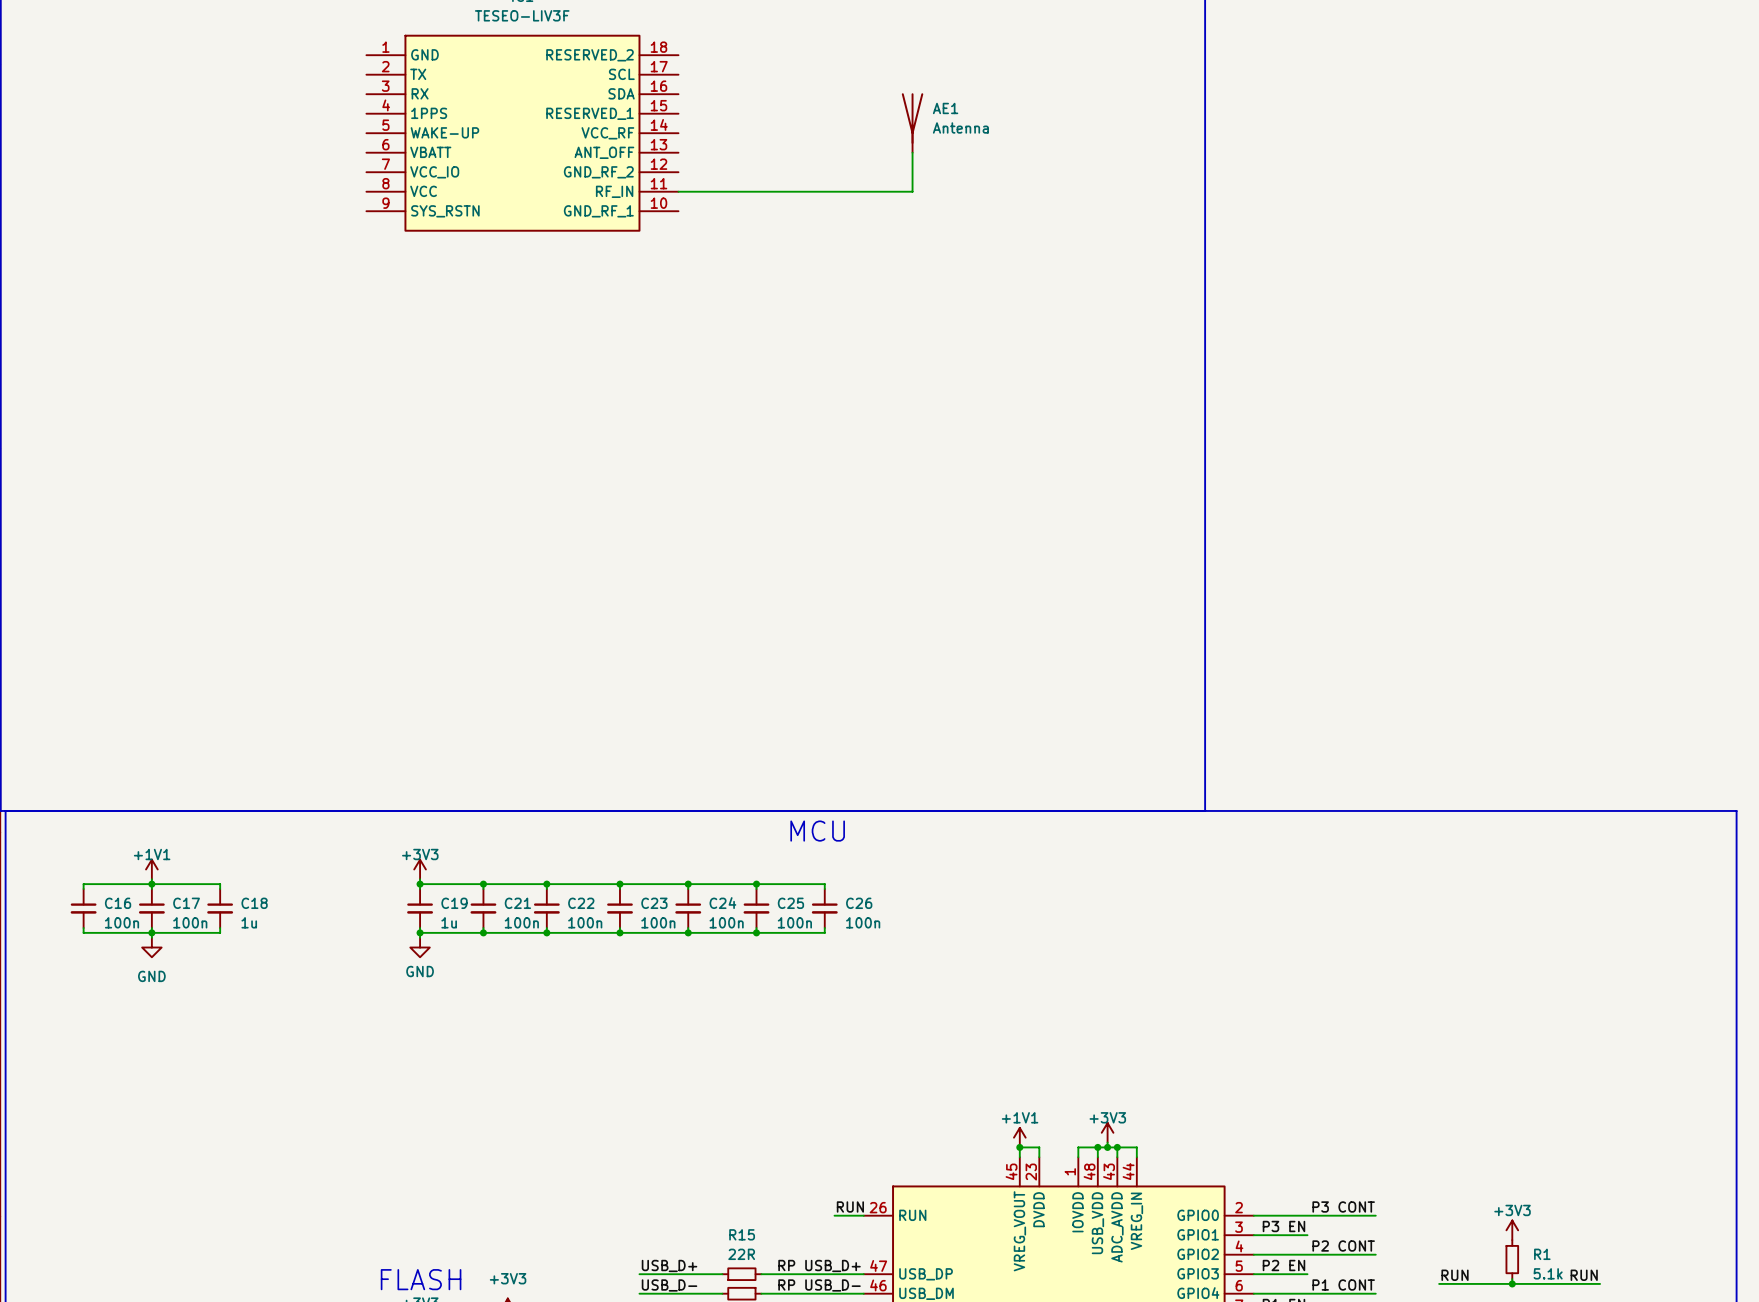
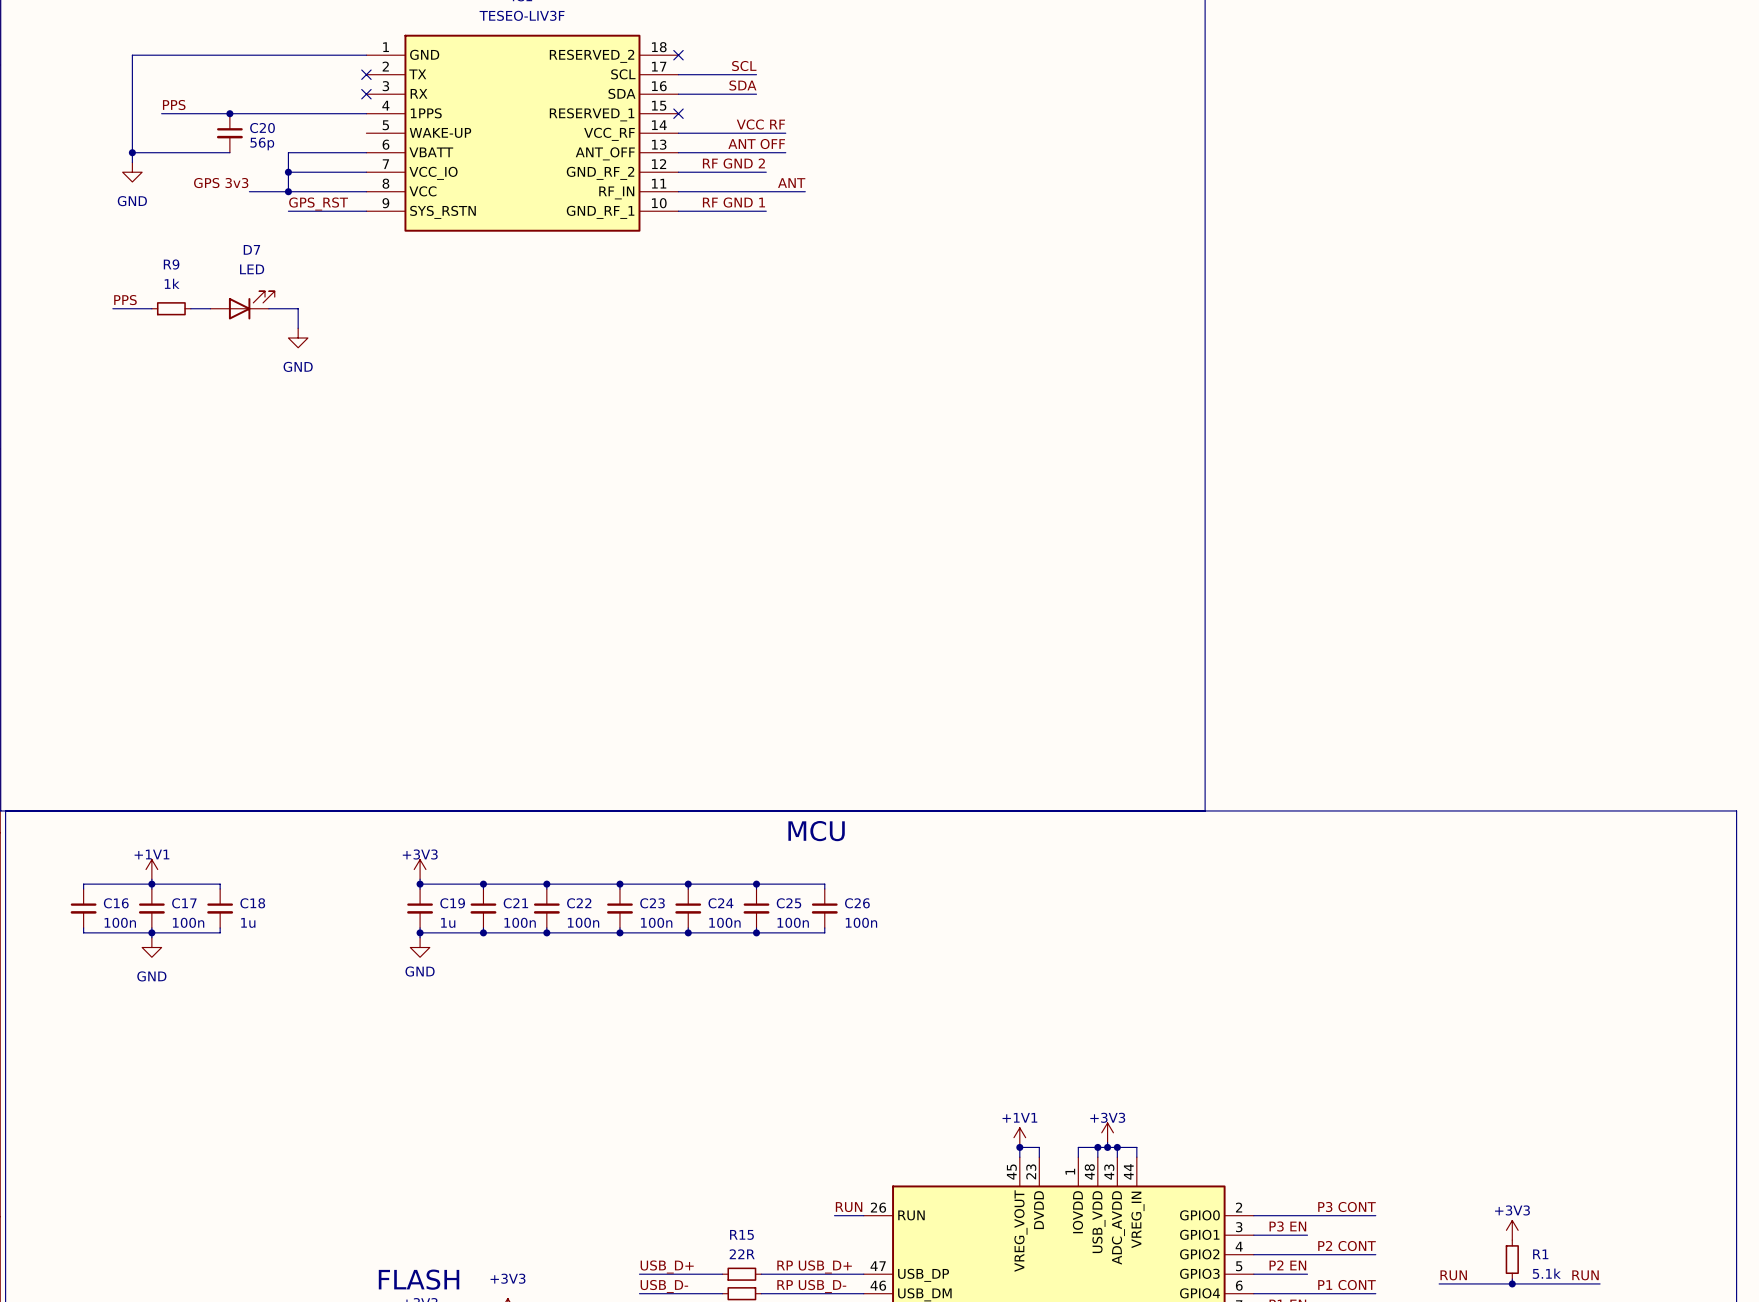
wire: none -> (366, 55) (132, 55) (132, 162)
no-connect mark: none -> (678, 55)
label: none -> SCL (744, 66)
no-connect mark: none -> (366, 74)
wire: none -> (678, 74) (756, 74)
label: none -> SDA (742, 85)
no-connect mark: none -> (366, 94)
wire: none -> (678, 94) (756, 94)
label: none -> PPS (174, 105)
wire: none -> (161, 113) (366, 113)
junction: none -> (229, 113)
no-connect mark: none -> (678, 113)
AE1: Antenna (912, 122) -> none
label: none -> VCC RF (760, 124)
C20: none -> 56p (229, 133)
wire: none -> (678, 133) (785, 133)
label: none -> ANT OFF (756, 144)
wire: none -> (132, 152) (229, 152)
junction: none -> (132, 152)
wire: none -> (366, 152) (288, 152) (288, 191)
wire: none -> (678, 152) (785, 152)
wire: (912, 152) (912, 191) (805, 191) -> none
label: none -> RF GND 2 (733, 163)
power symbol: none -> GND (132, 172)
wire: none -> (288, 172) (366, 172)
junction: none -> (288, 172)
wire: none -> (678, 172) (766, 172)
label: none -> GPS 3v3 (221, 183)
label: none -> ANT (791, 183)
wire: none -> (249, 191) (366, 191)
junction: none -> (288, 191)
label: none -> GPS_RST (318, 204)
label: none -> RF GND 1 (733, 202)
wire: none -> (288, 211) (366, 211)
wire: none -> (678, 211) (766, 211)
label: none -> PPS (125, 300)
D7: none -> LED (242, 305)
wire: none -> (112, 308) (151, 308)
R9: none -> 1k (171, 308)
wire: none -> (190, 308) (210, 308)
wire: none -> (268, 308) (298, 308) (298, 328)
power symbol: none -> GND (298, 338)

